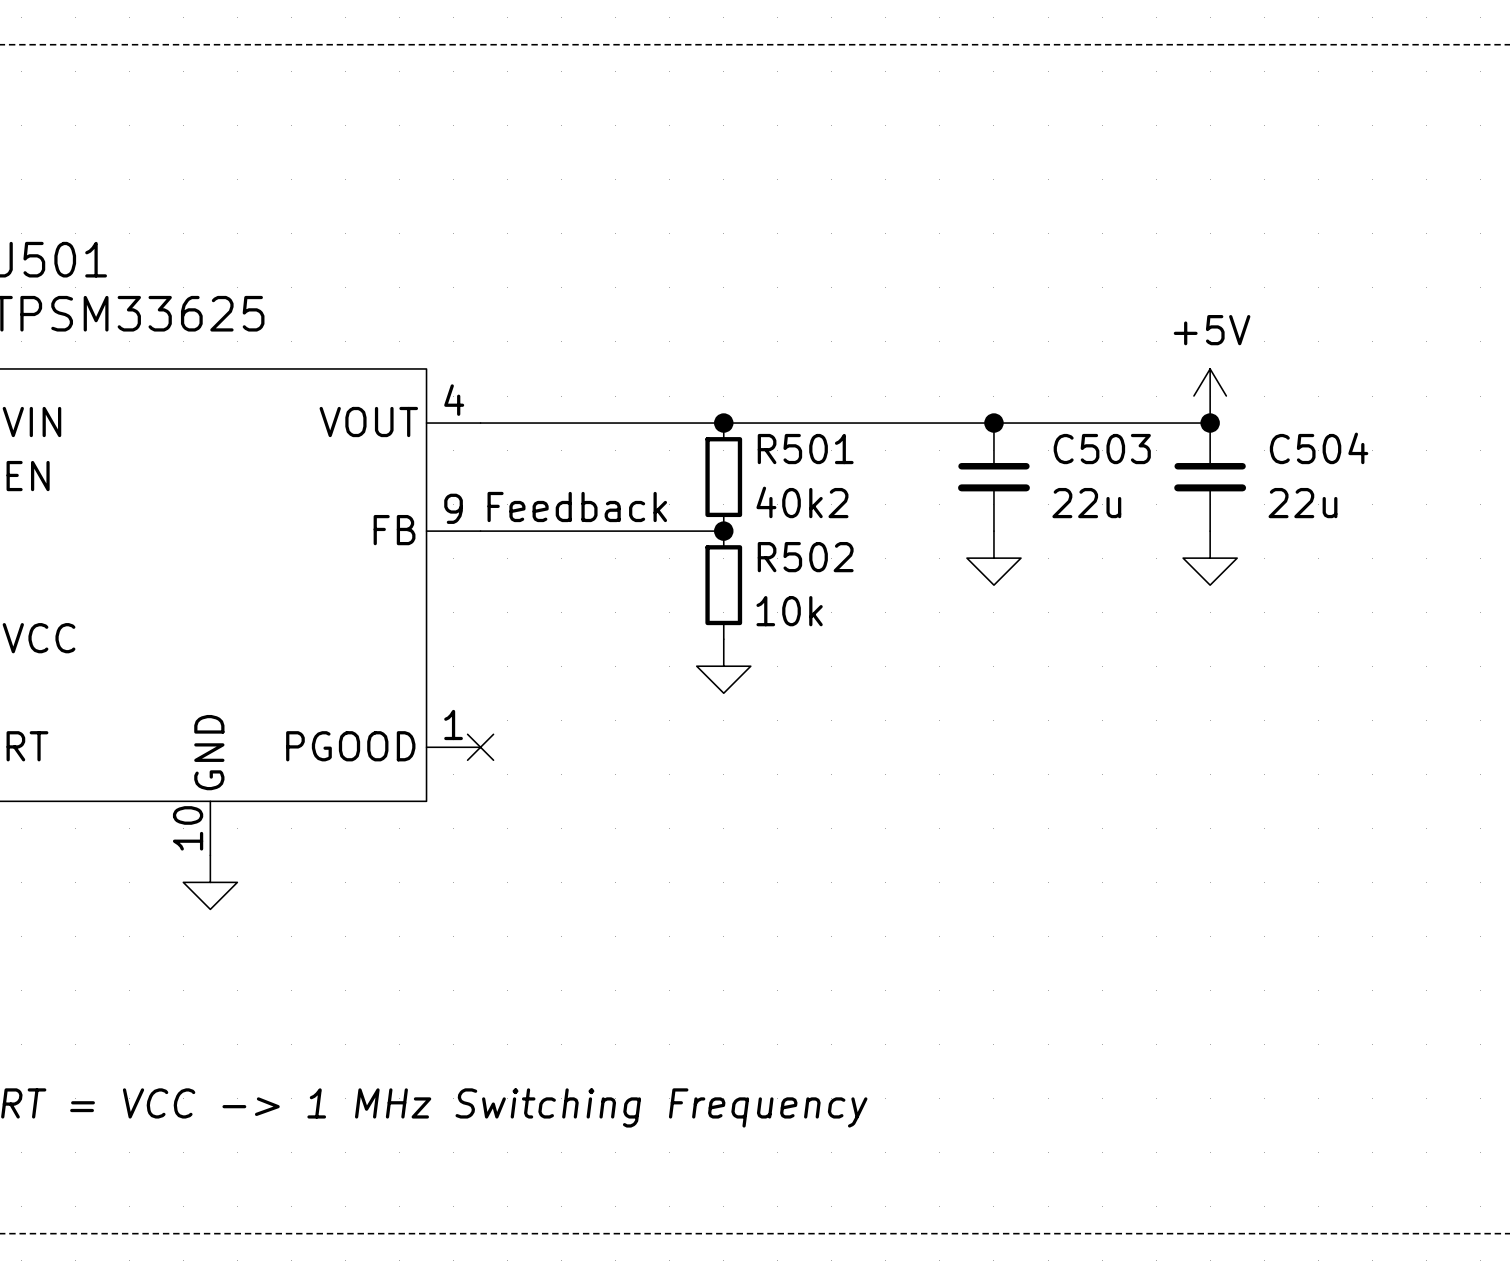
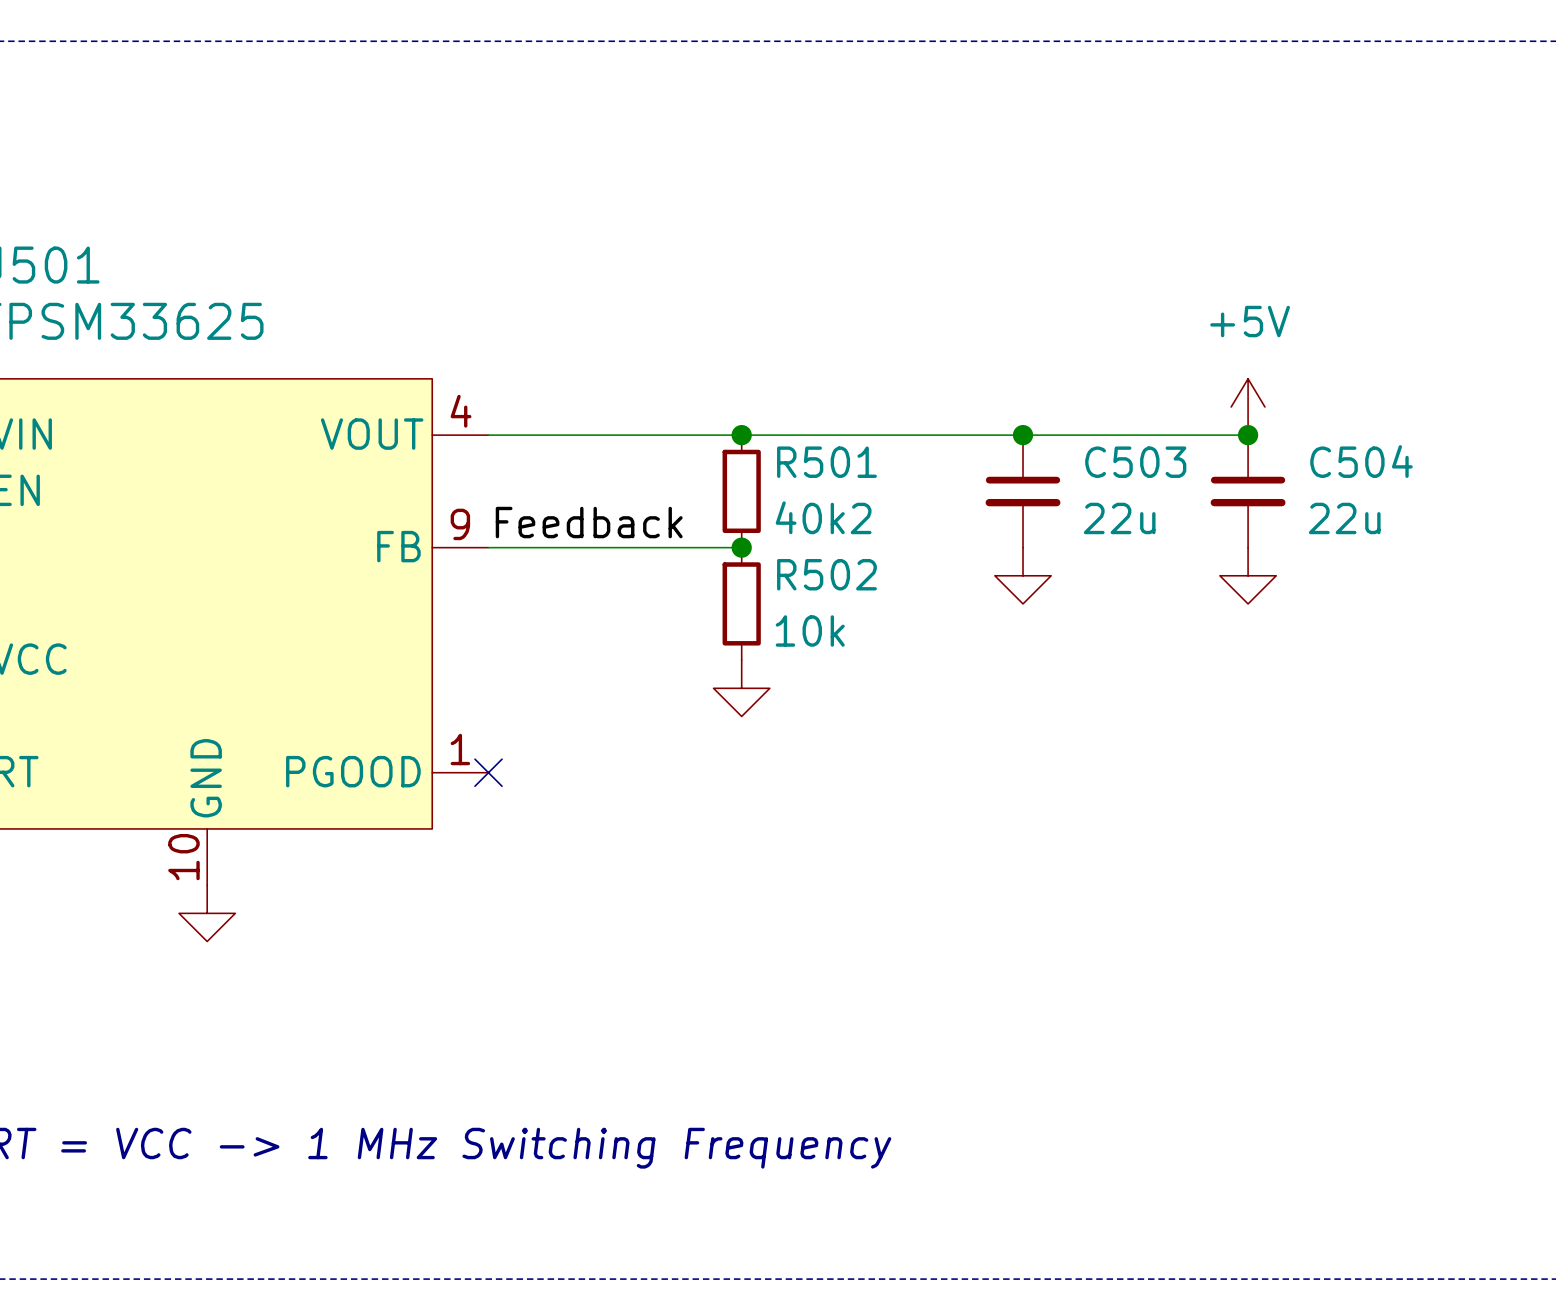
power symbol text position: +5V (1212, 330) -> +5V (1250, 321)

